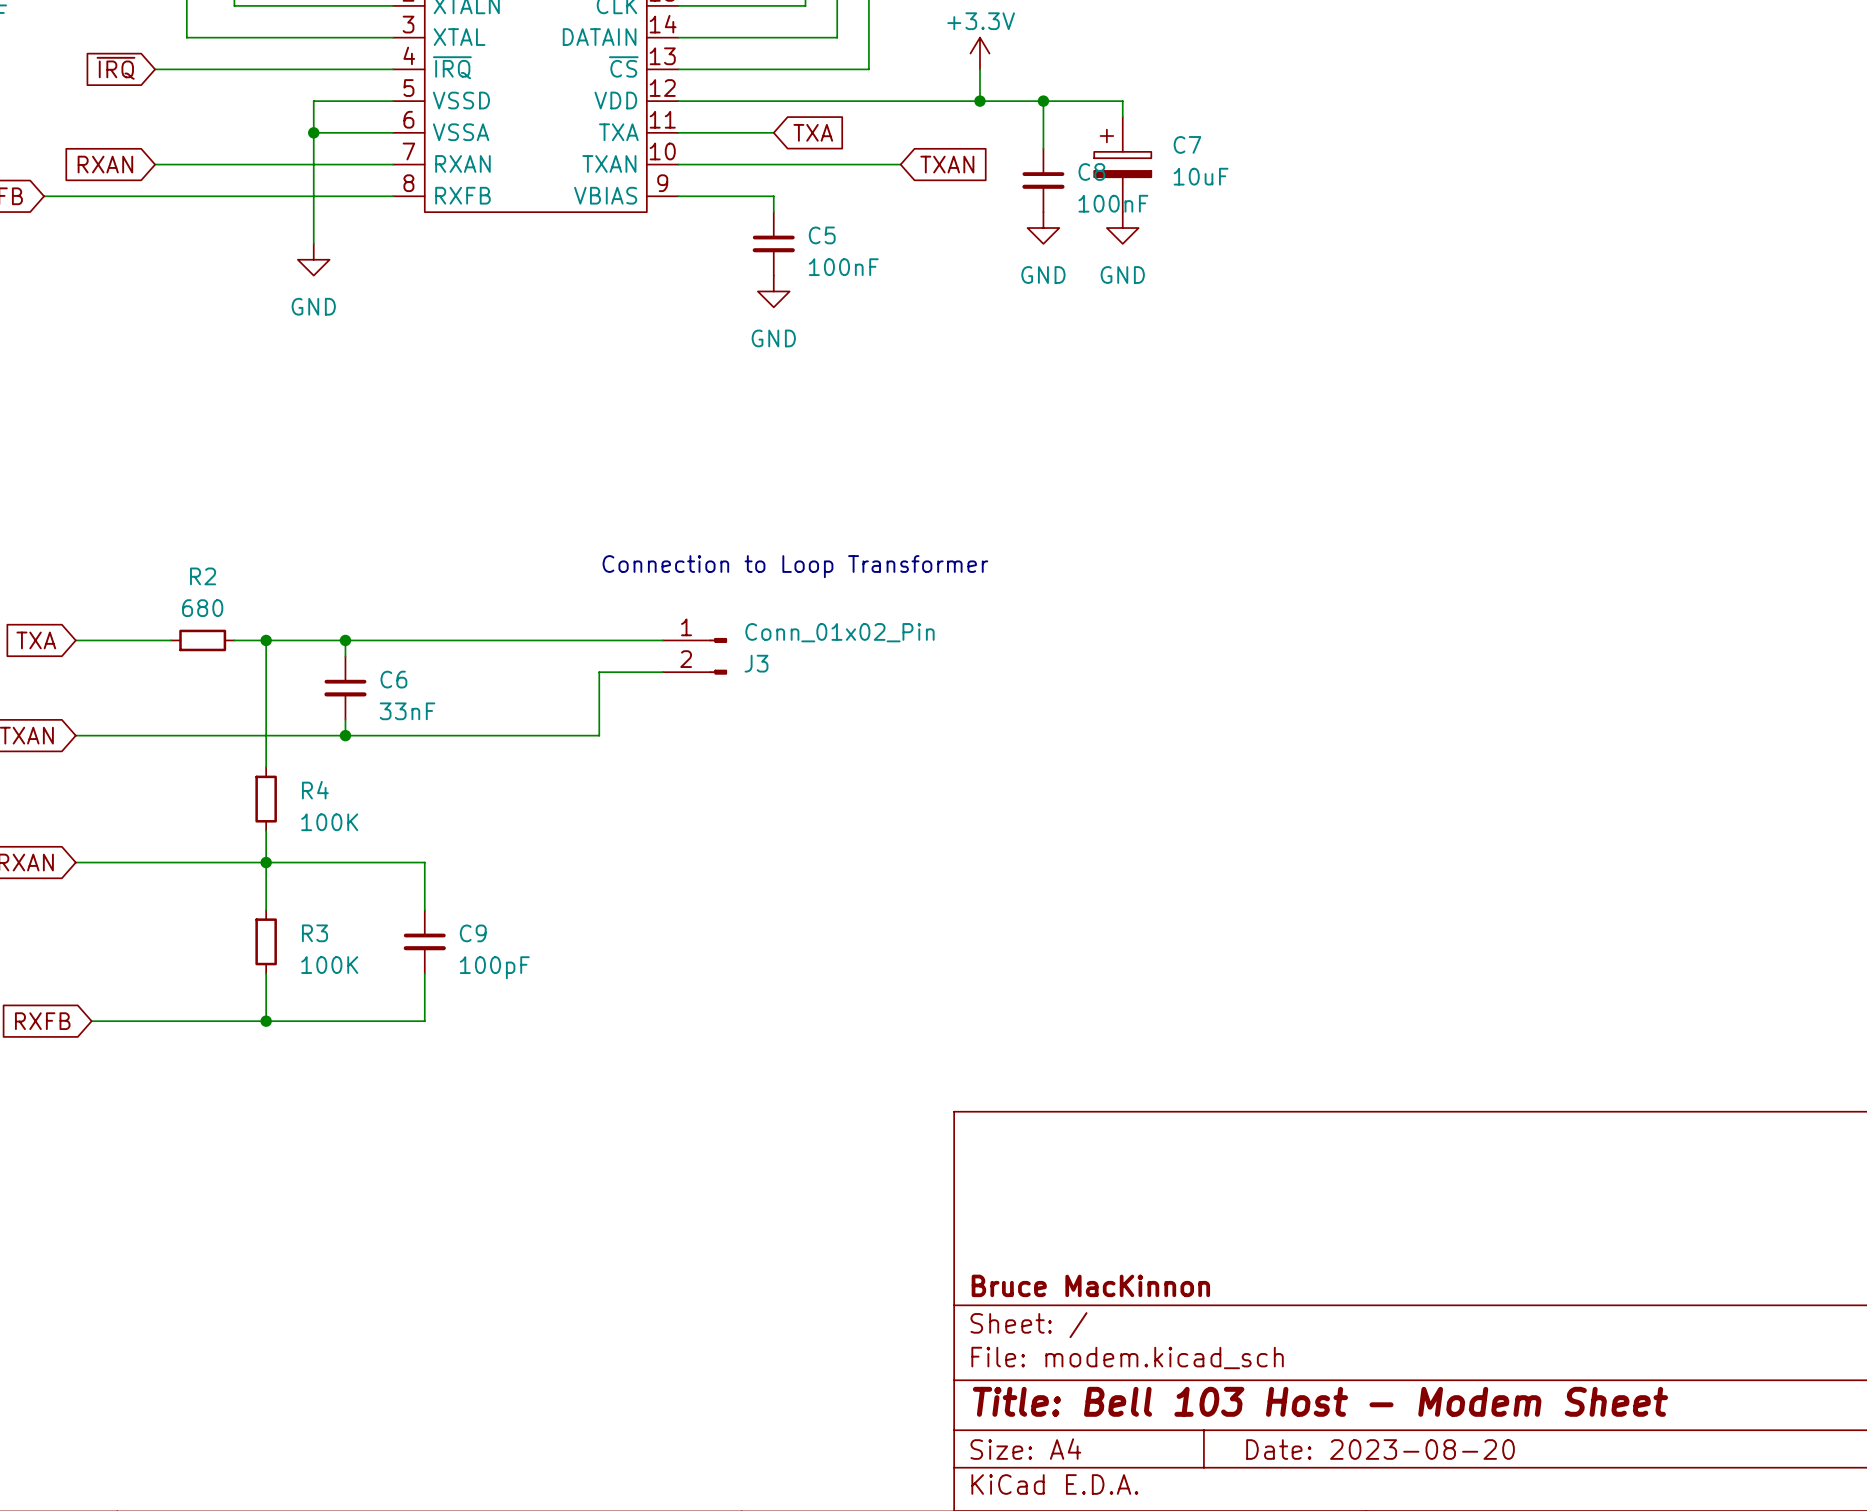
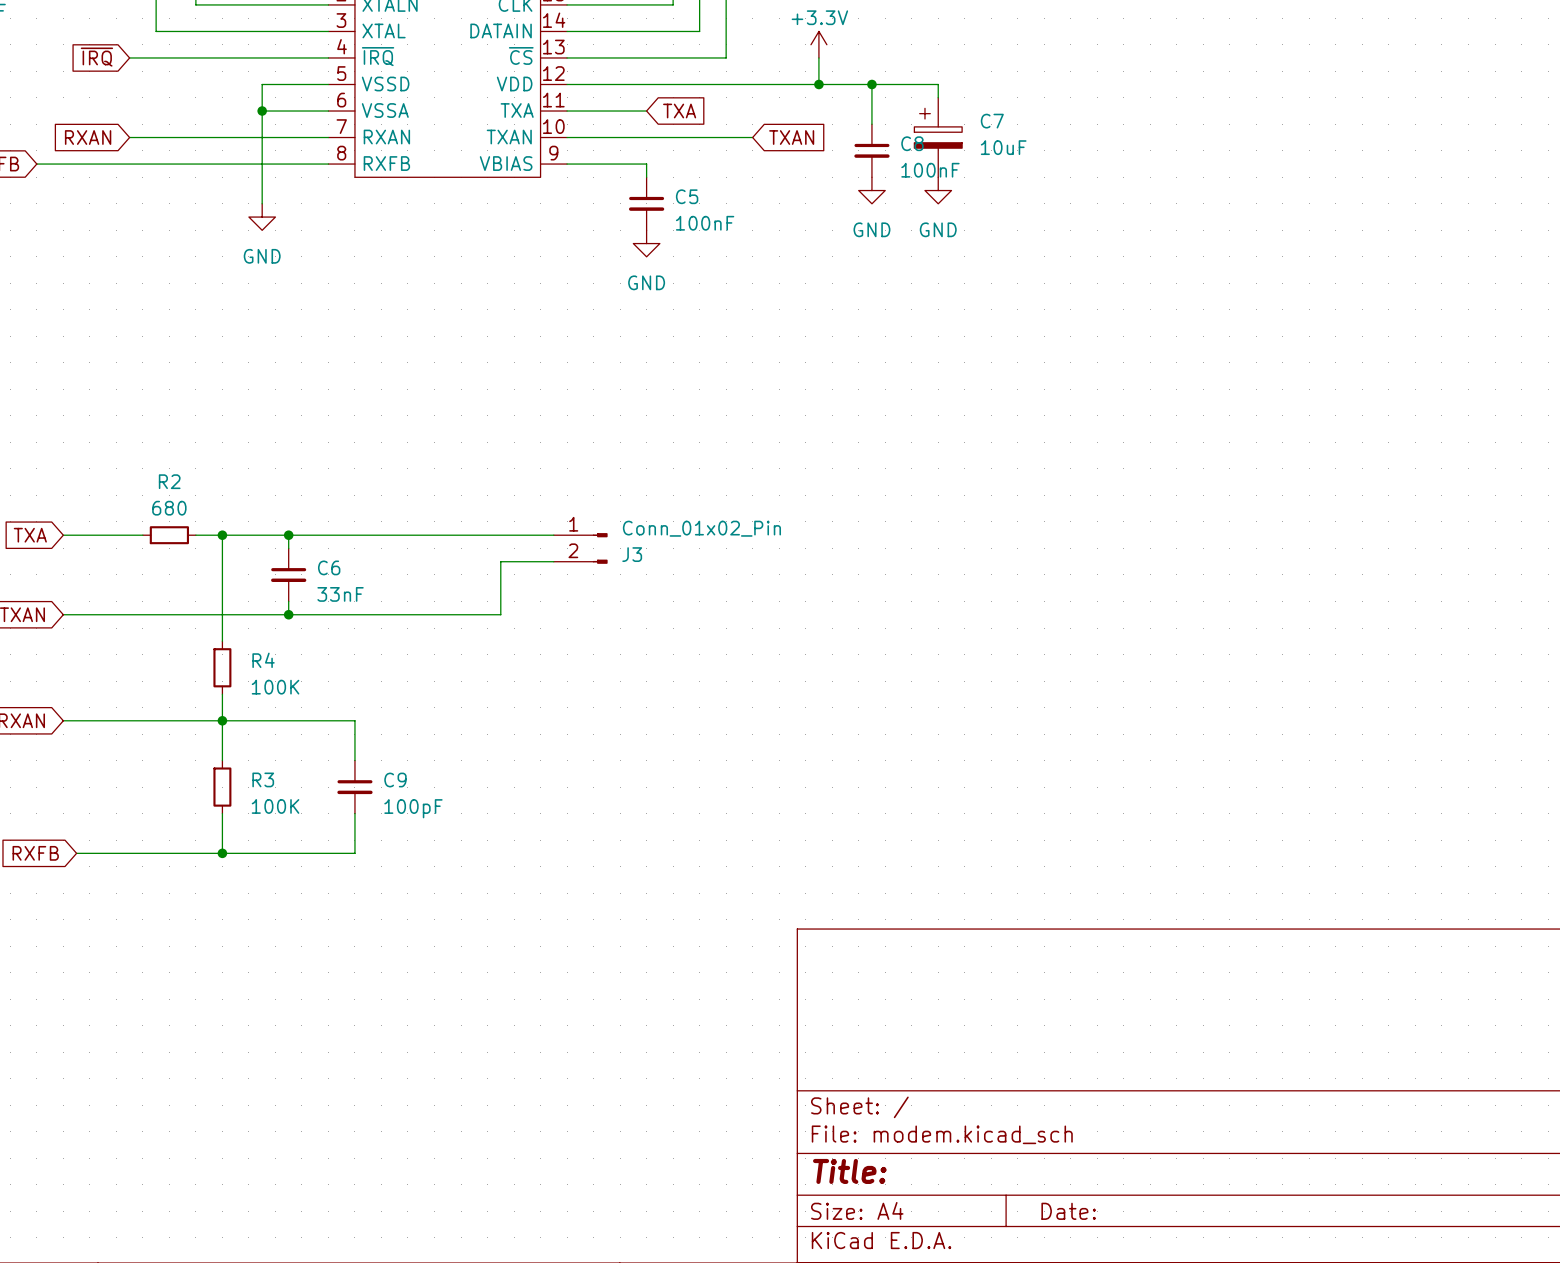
text: Connection to Loop Transformer (795, 566) -> none
title block: Bruce MacKinnon (1090, 1285) -> none
title block: Title: Bell 103 Host - Modem Sheet (1320, 1401) -> Title: (849, 1171)
title block: Date: 2023-08-20 (1380, 1449) -> Date: (1068, 1211)

